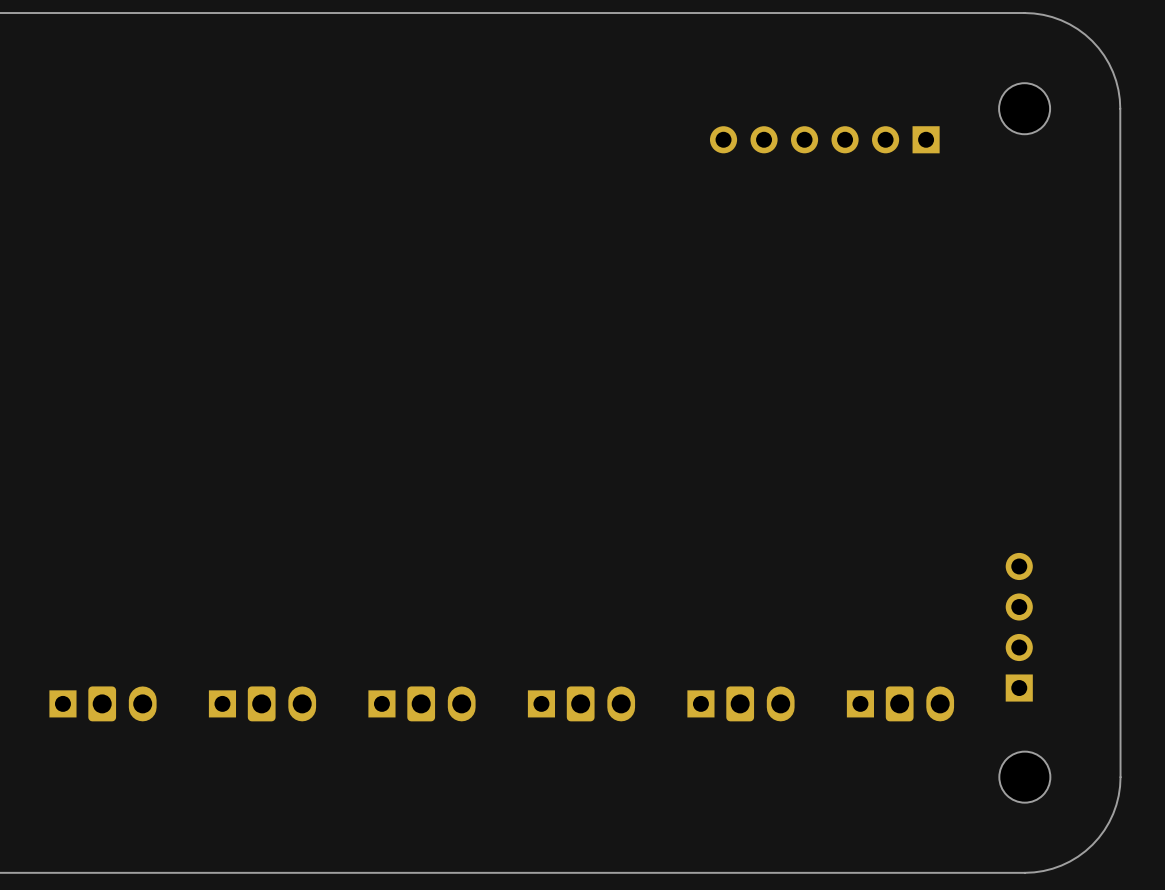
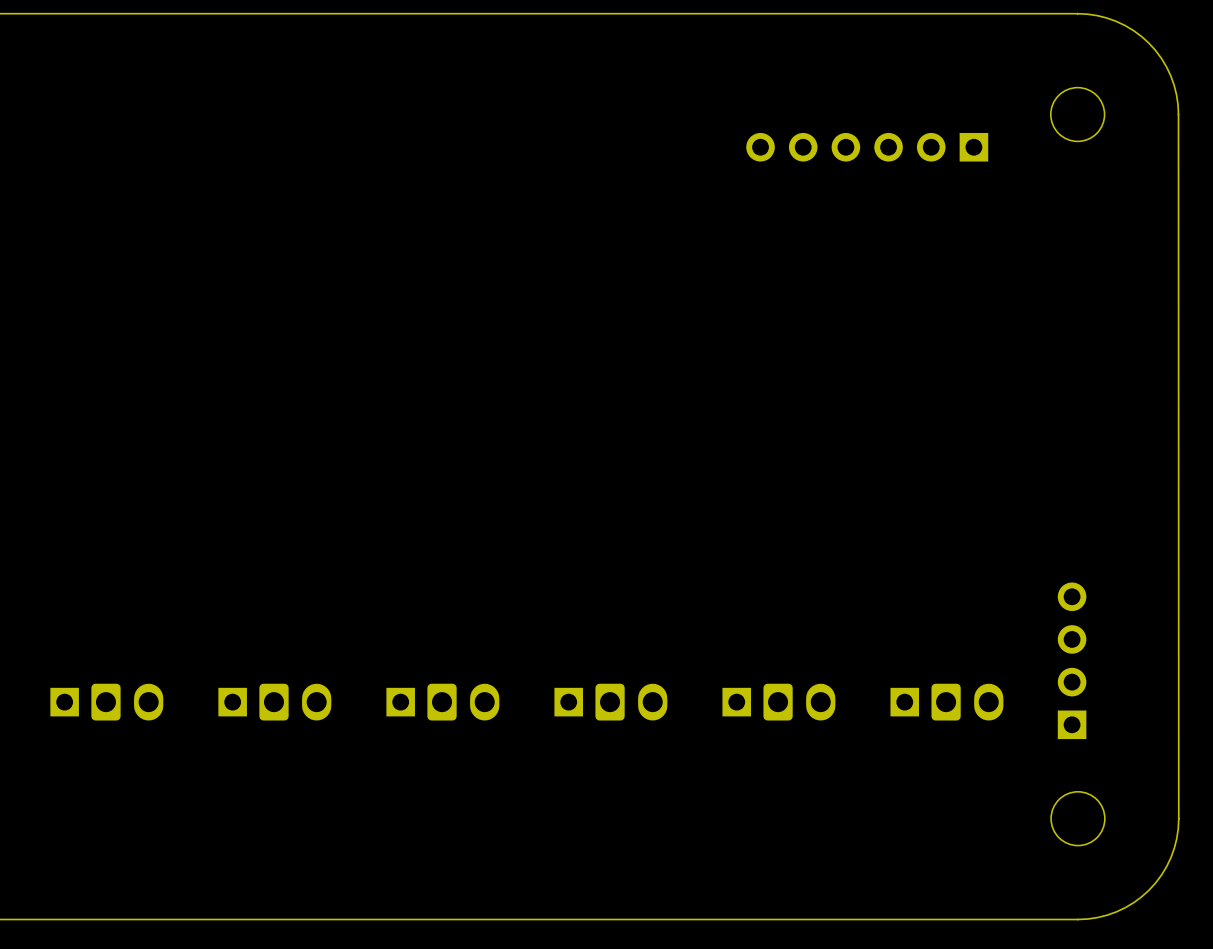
part position: (62, 703) -> (64, 702)
part position: (122, 703) -> (127, 702)
part position: (222, 703) -> (232, 702)
part position: (281, 703) -> (295, 702)
part position: (381, 703) -> (400, 702)
part position: (441, 703) -> (463, 702)
part position: (541, 703) -> (568, 702)
part position: (600, 703) -> (631, 702)
part position: (700, 703) -> (736, 702)
part position: (760, 703) -> (799, 702)
part position: (860, 703) -> (904, 702)
part position: (919, 703) -> (967, 702)

